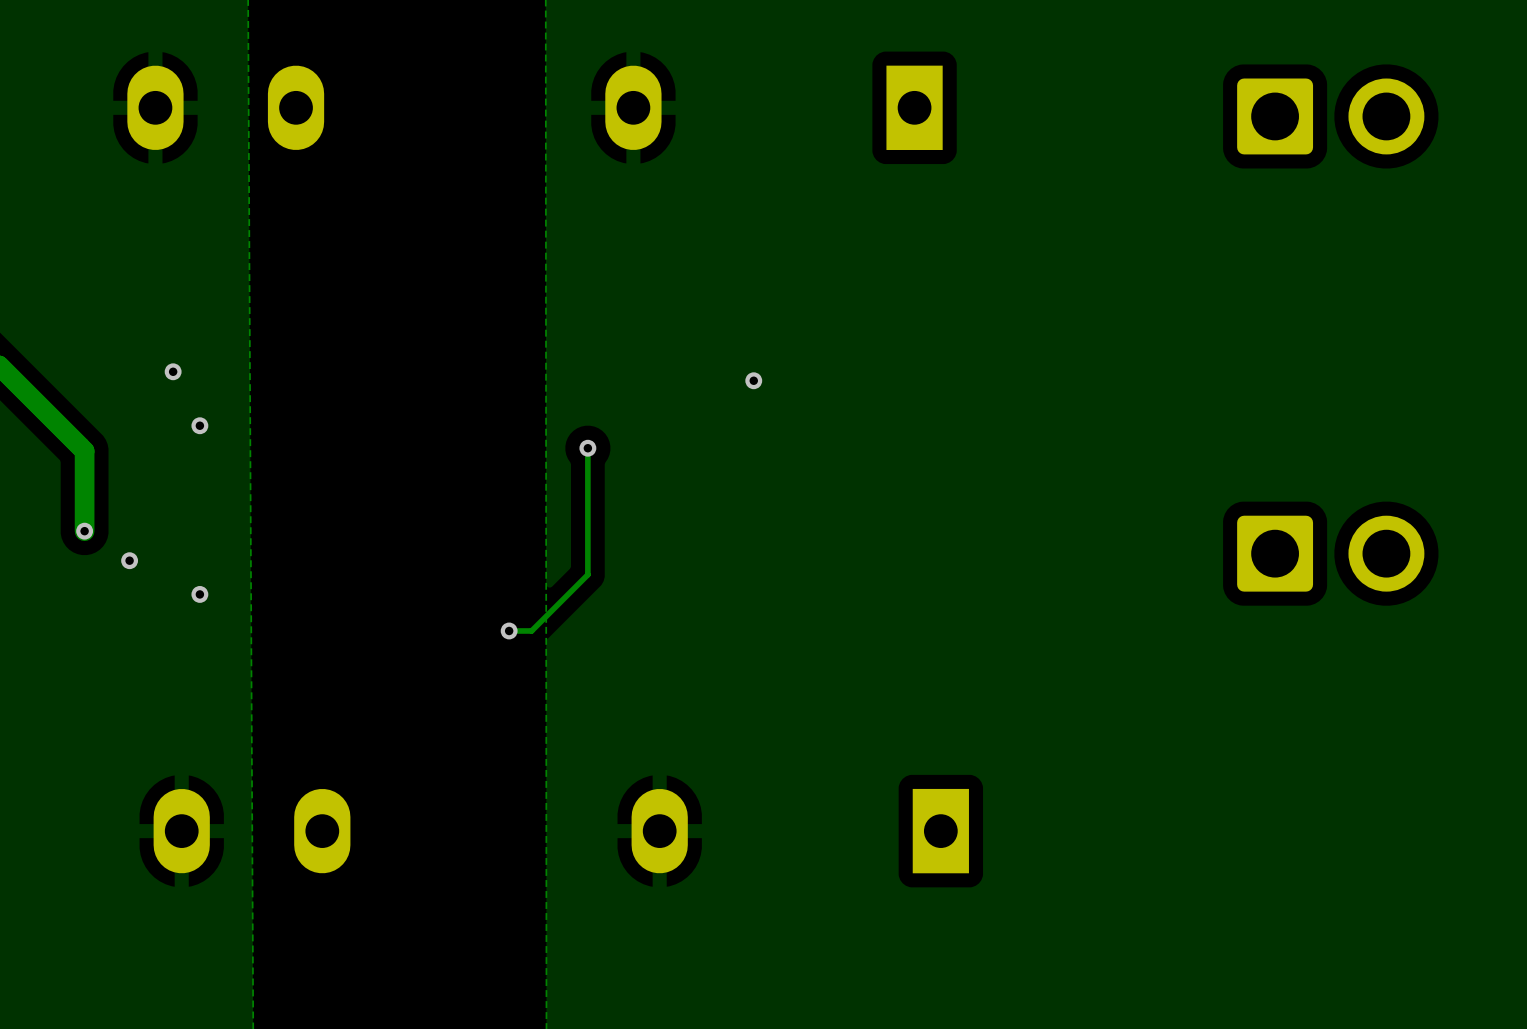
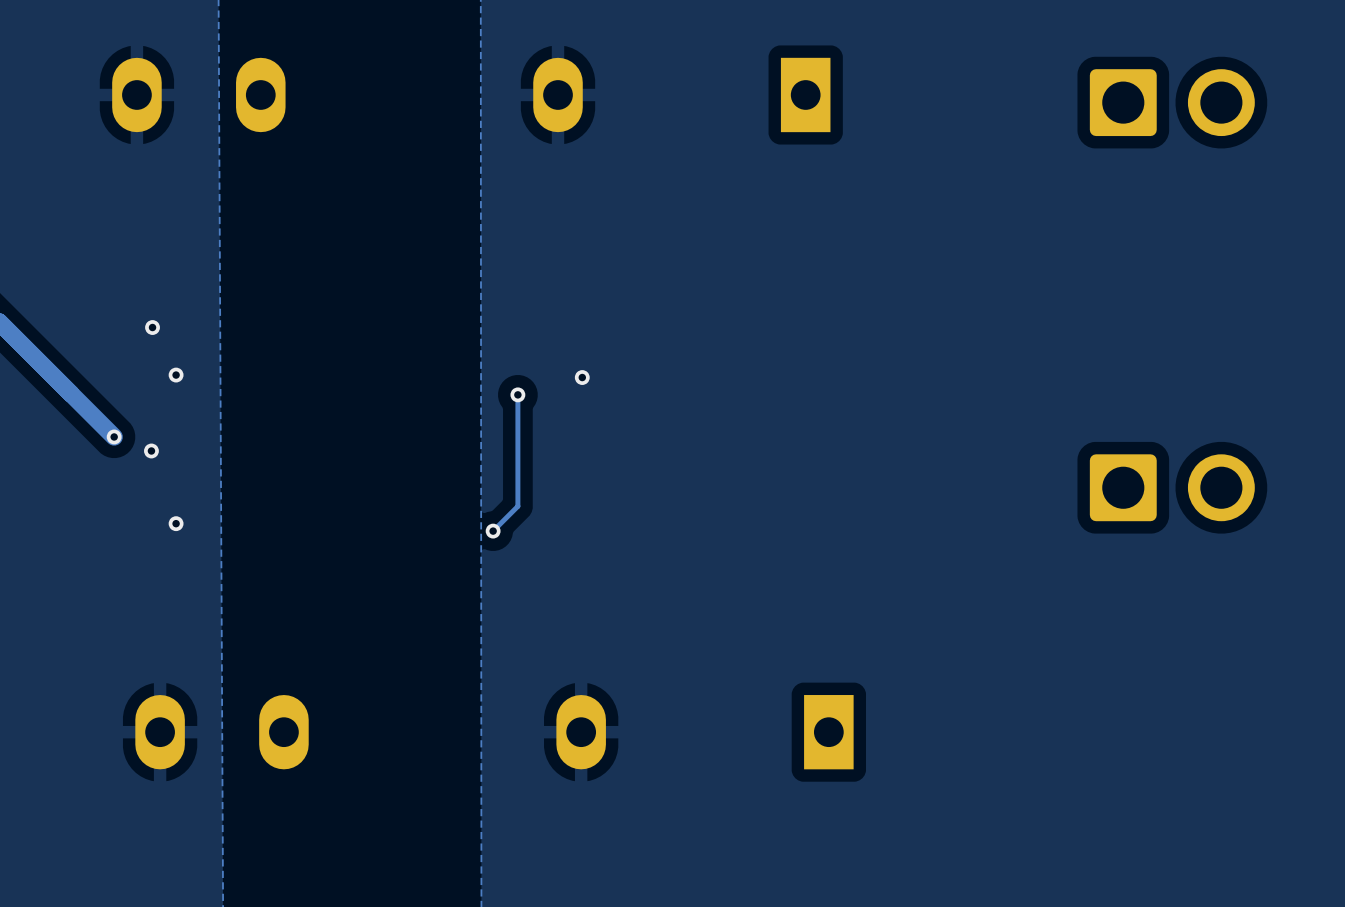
via position: (753, 380) -> (582, 377)
track: (84, 451) (84, 531) -> (74, 397) (114, 436)
via: none -> (114, 436)
via: none -> (151, 450)
via: (84, 531) -> none
via: (129, 560) -> none
track: (559, 602) (531, 630) (509, 630) -> none
via position: (509, 630) -> (493, 531)

